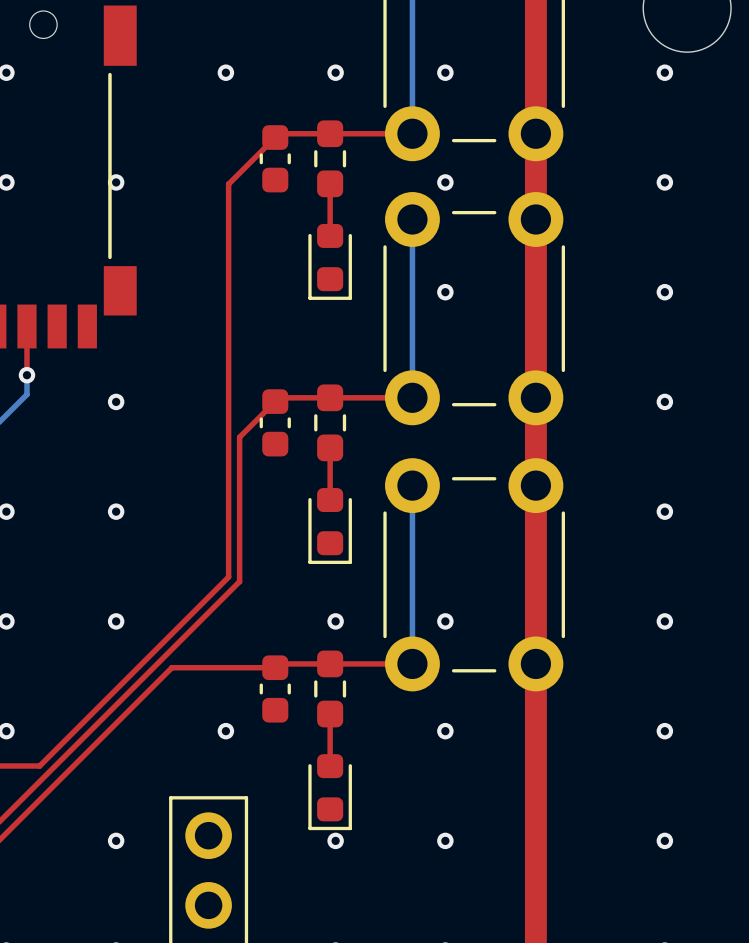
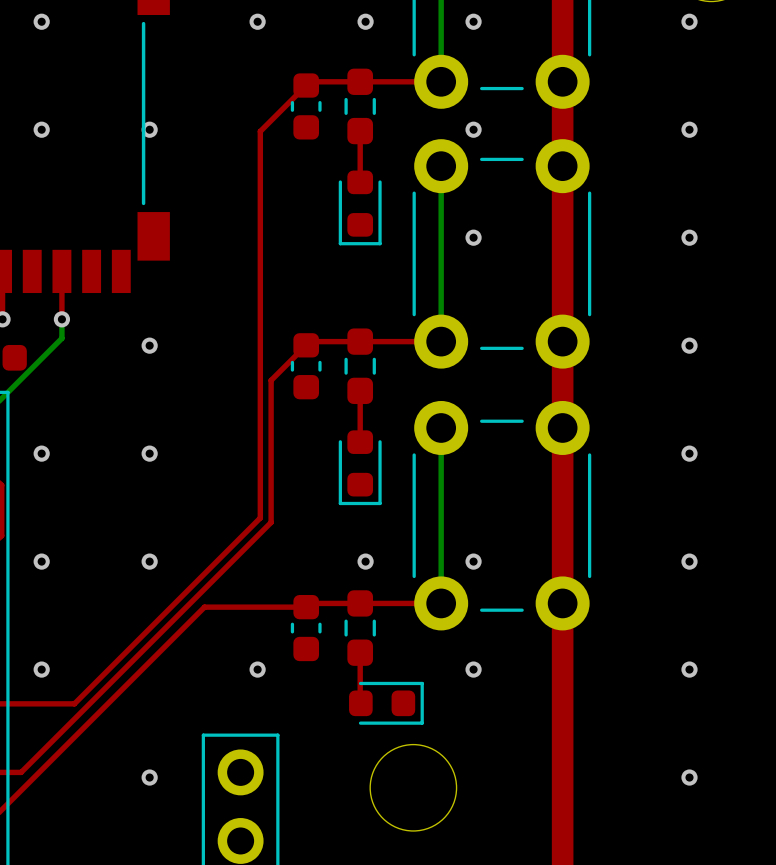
part rotation: 0° (330, 792) -> 90° counterclockwise (386, 703)
round board edge: none -> [369, 743, 458, 832]
via: (335, 840) -> none
via: (445, 840) -> none

